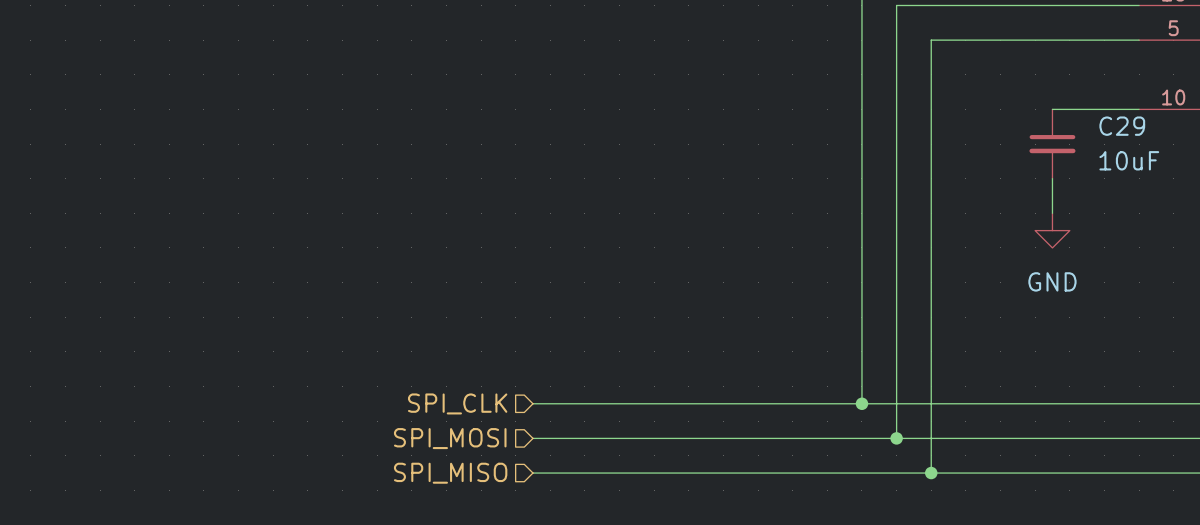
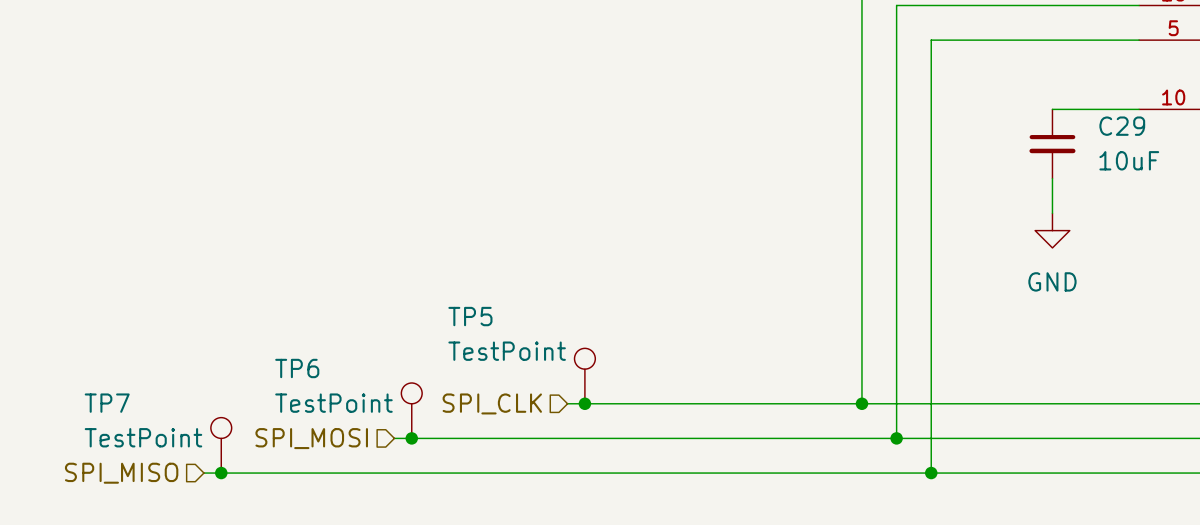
TP5: none -> TestPoint (584, 376)
hierarchical label position: SPI_CLK (457, 403) -> SPI_CLK (492, 403)
wire: (532, 403) (567, 403) -> none
junction: none -> (584, 403)
TP6: none -> TestPoint (411, 410)
wire: none -> (394, 438) (532, 438)
junction: none -> (411, 438)
hierarchical label position: SPI_MOSI (450, 438) -> SPI_MOSI (311, 438)
TP7: none -> TestPoint (221, 445)
wire: none -> (203, 473) (532, 473)
junction: none -> (221, 473)
hierarchical label position: SPI_MISO (450, 473) -> SPI_MISO (121, 473)

